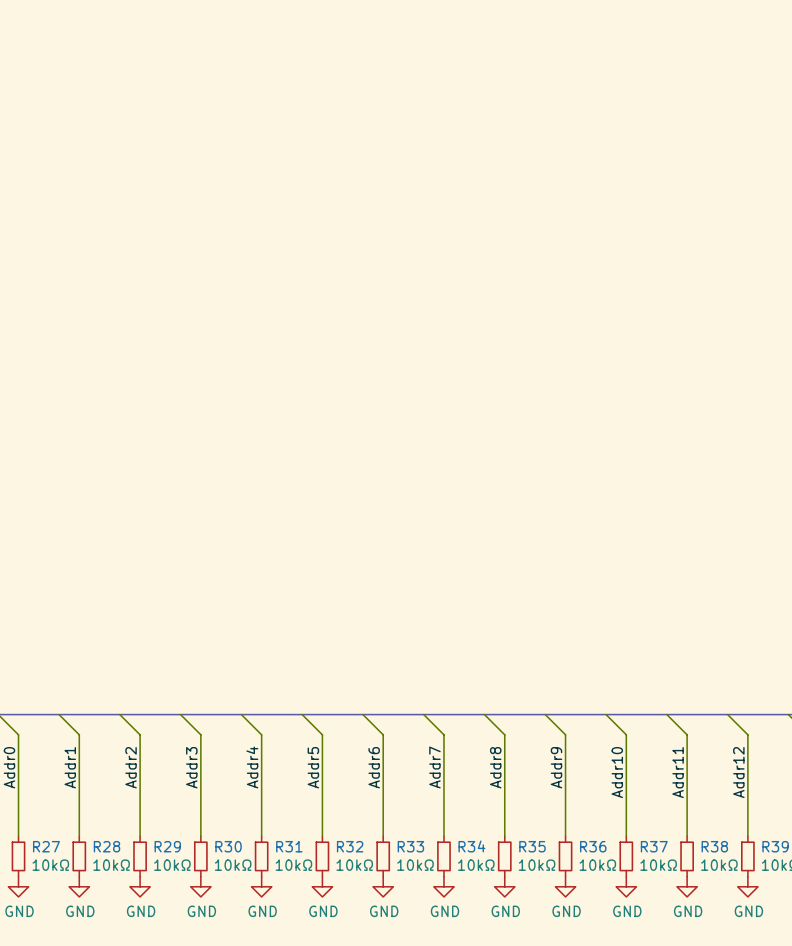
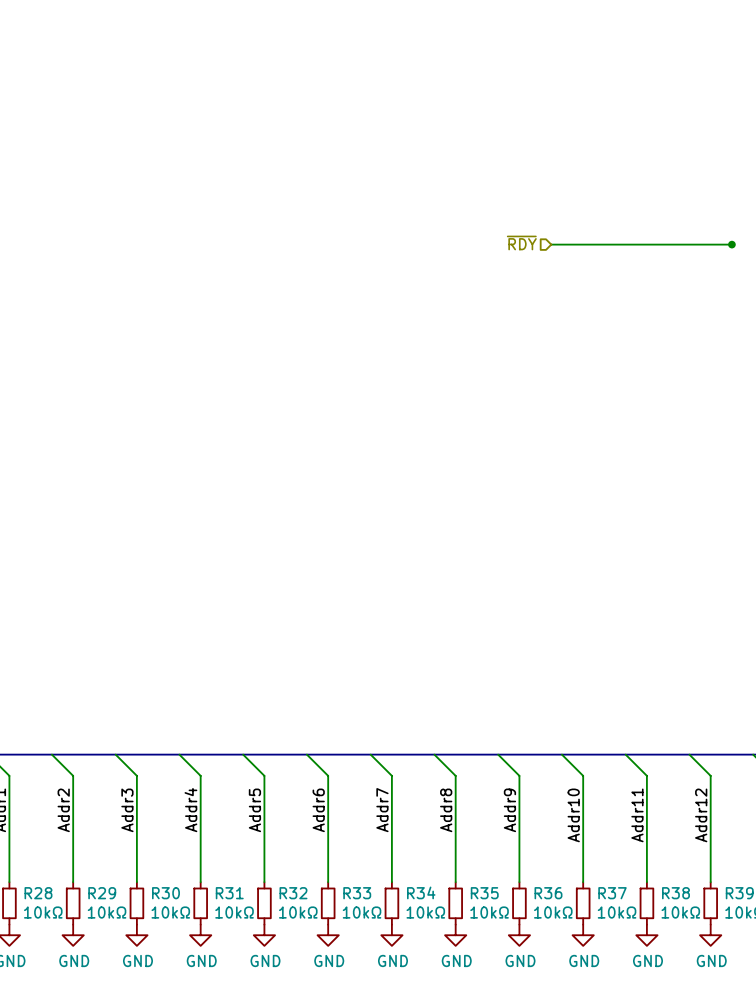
hierarchical label: none -> ~{RDY} (521, 242)
wire: none -> (551, 244) (731, 244)
junction: none -> (731, 244)

